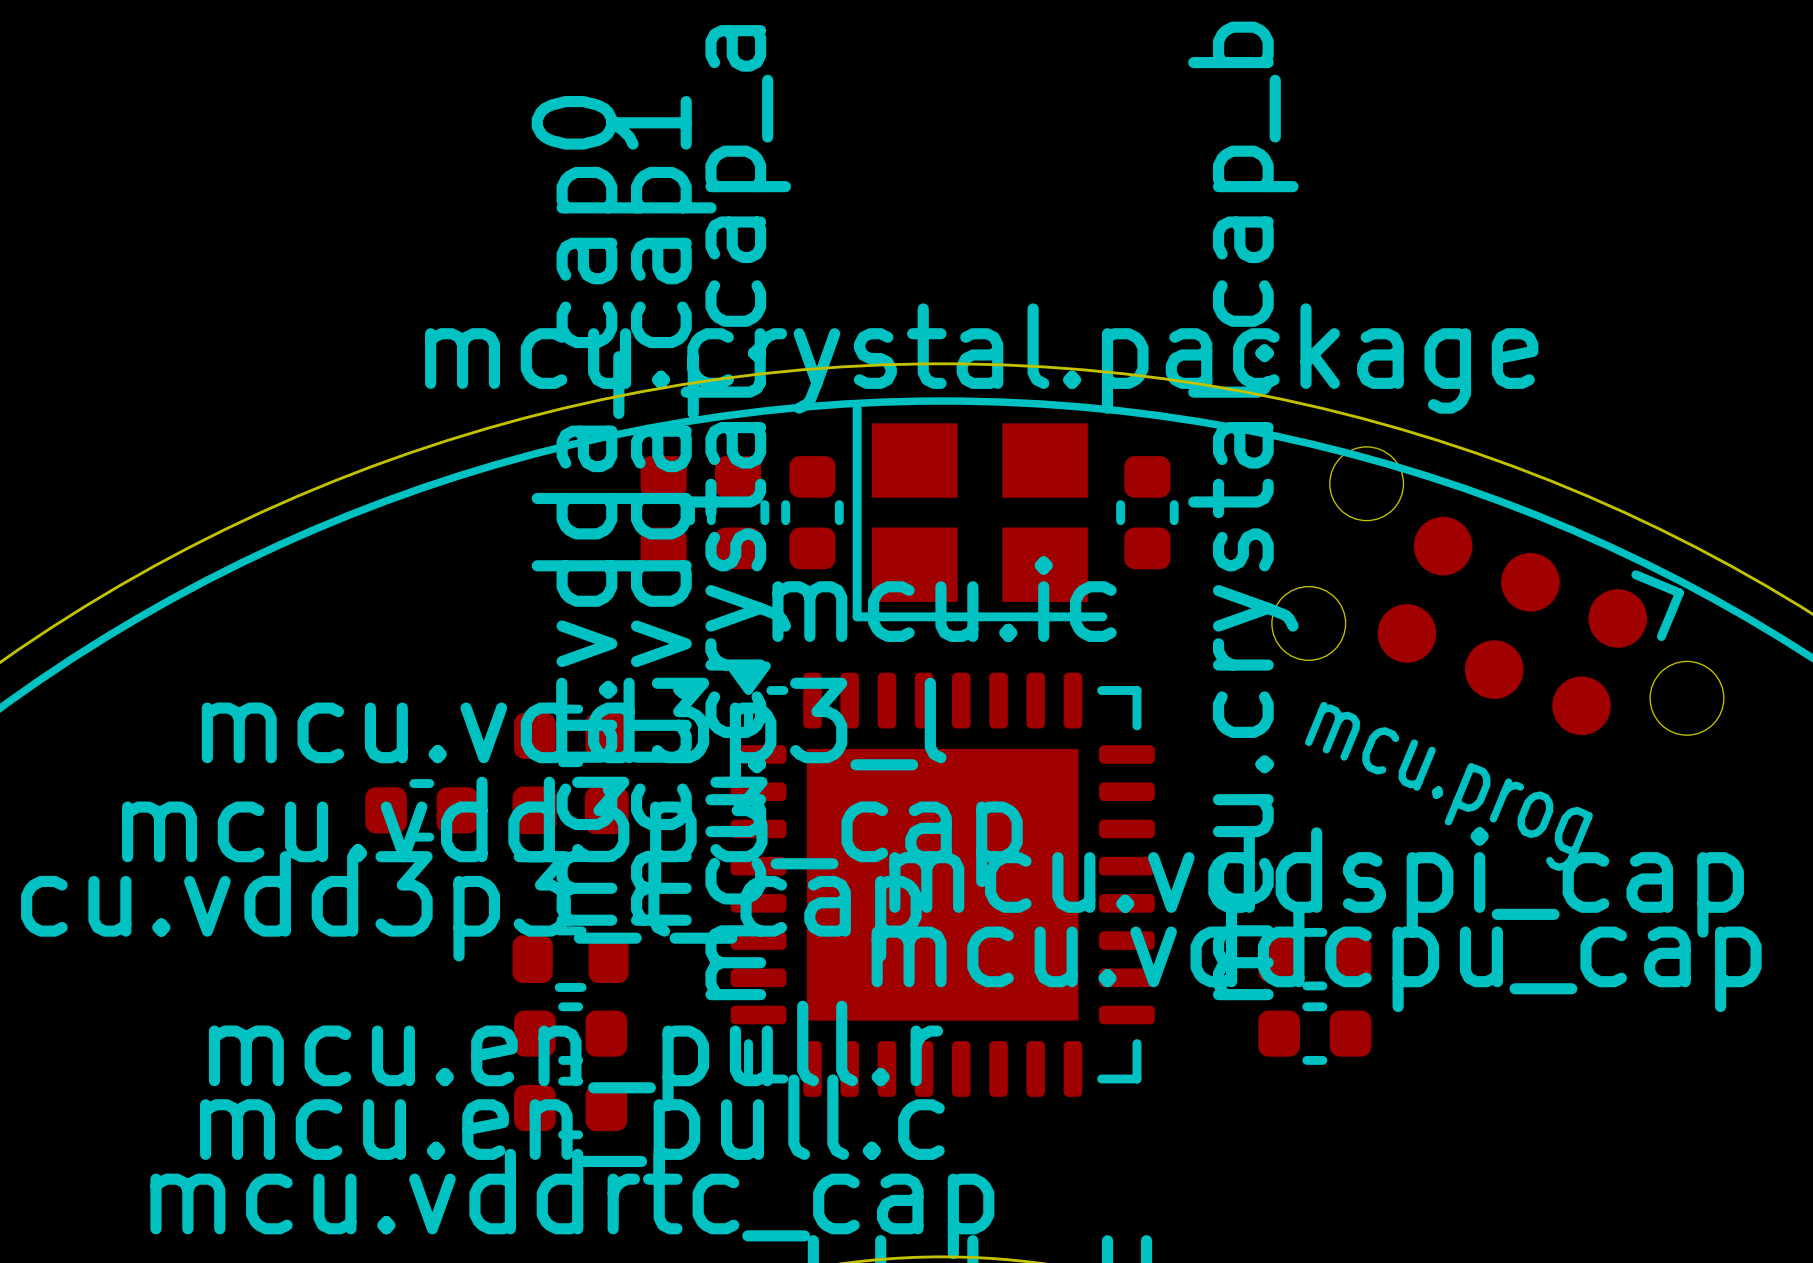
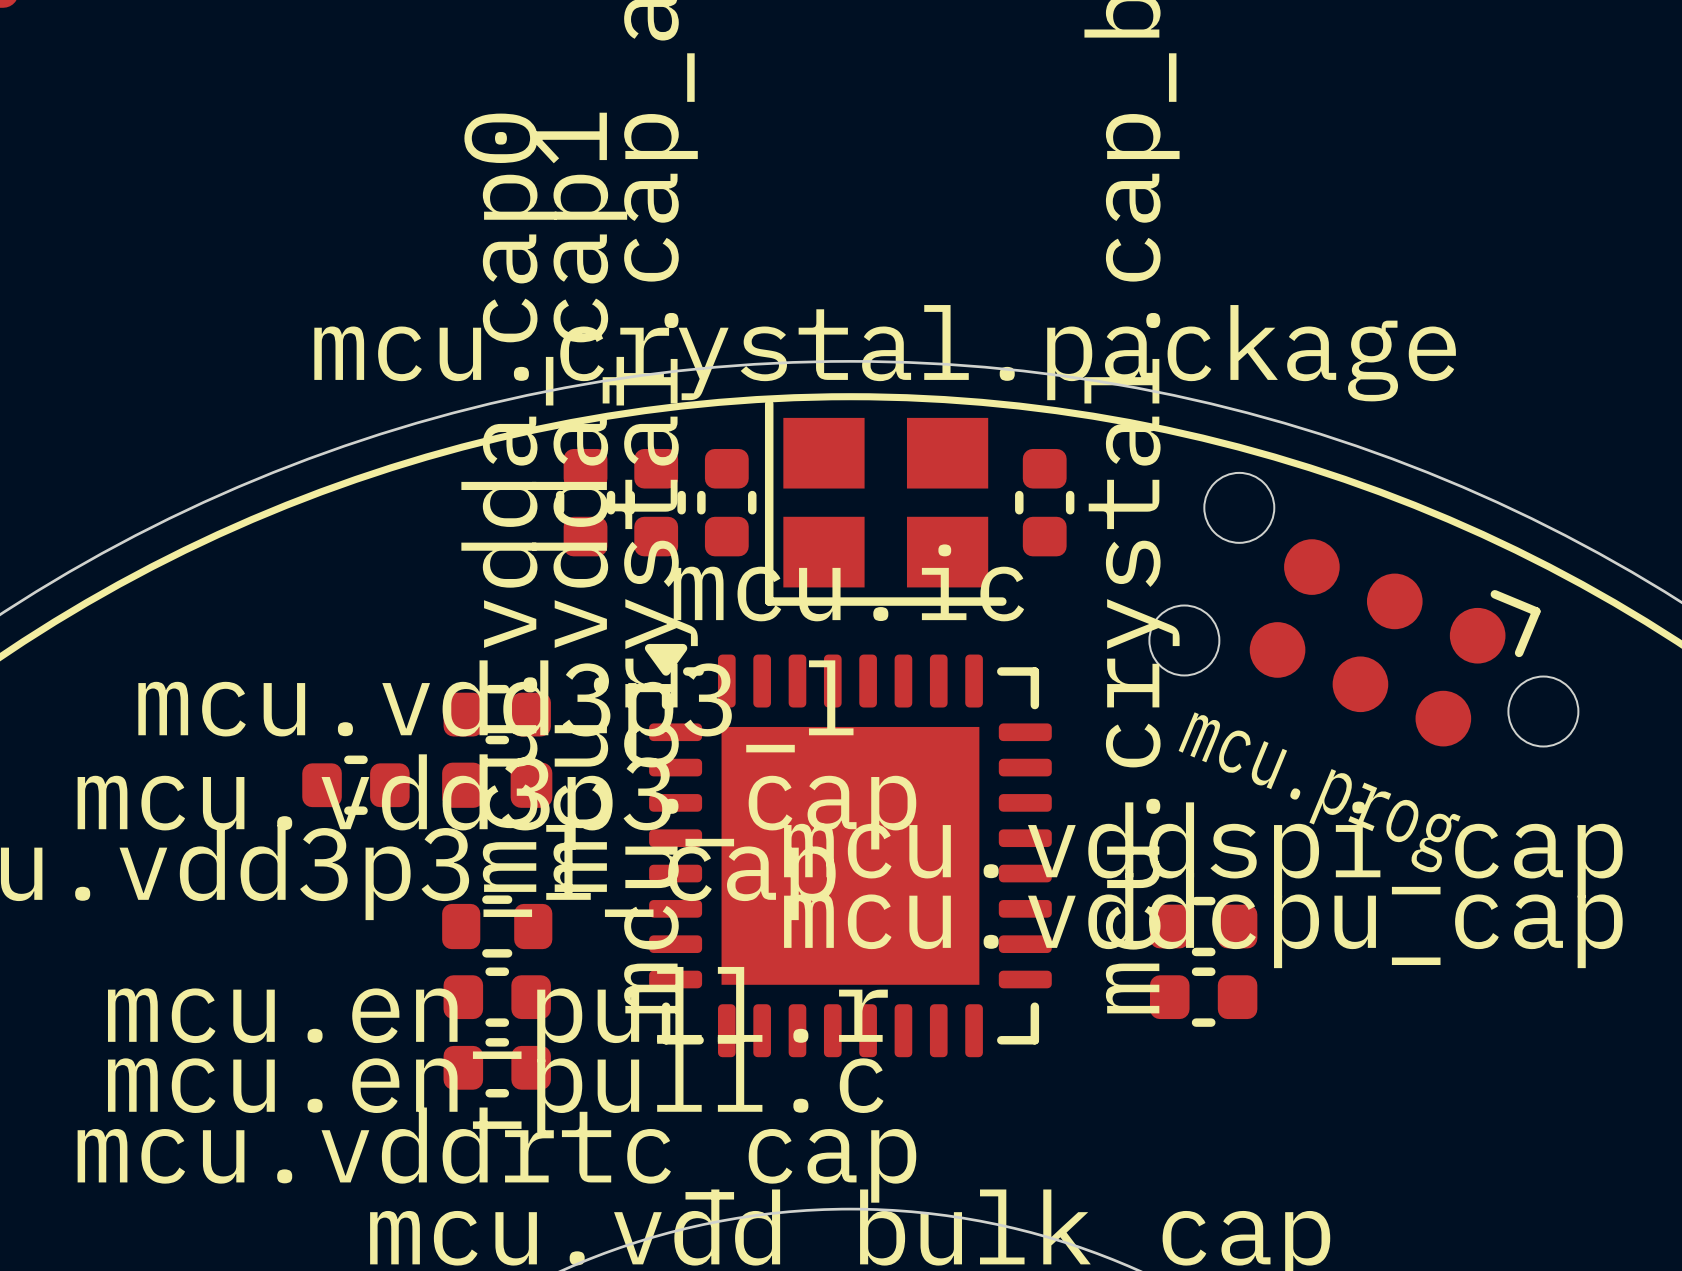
mcu.prog position: (1497, 591) -> (1363, 609)

